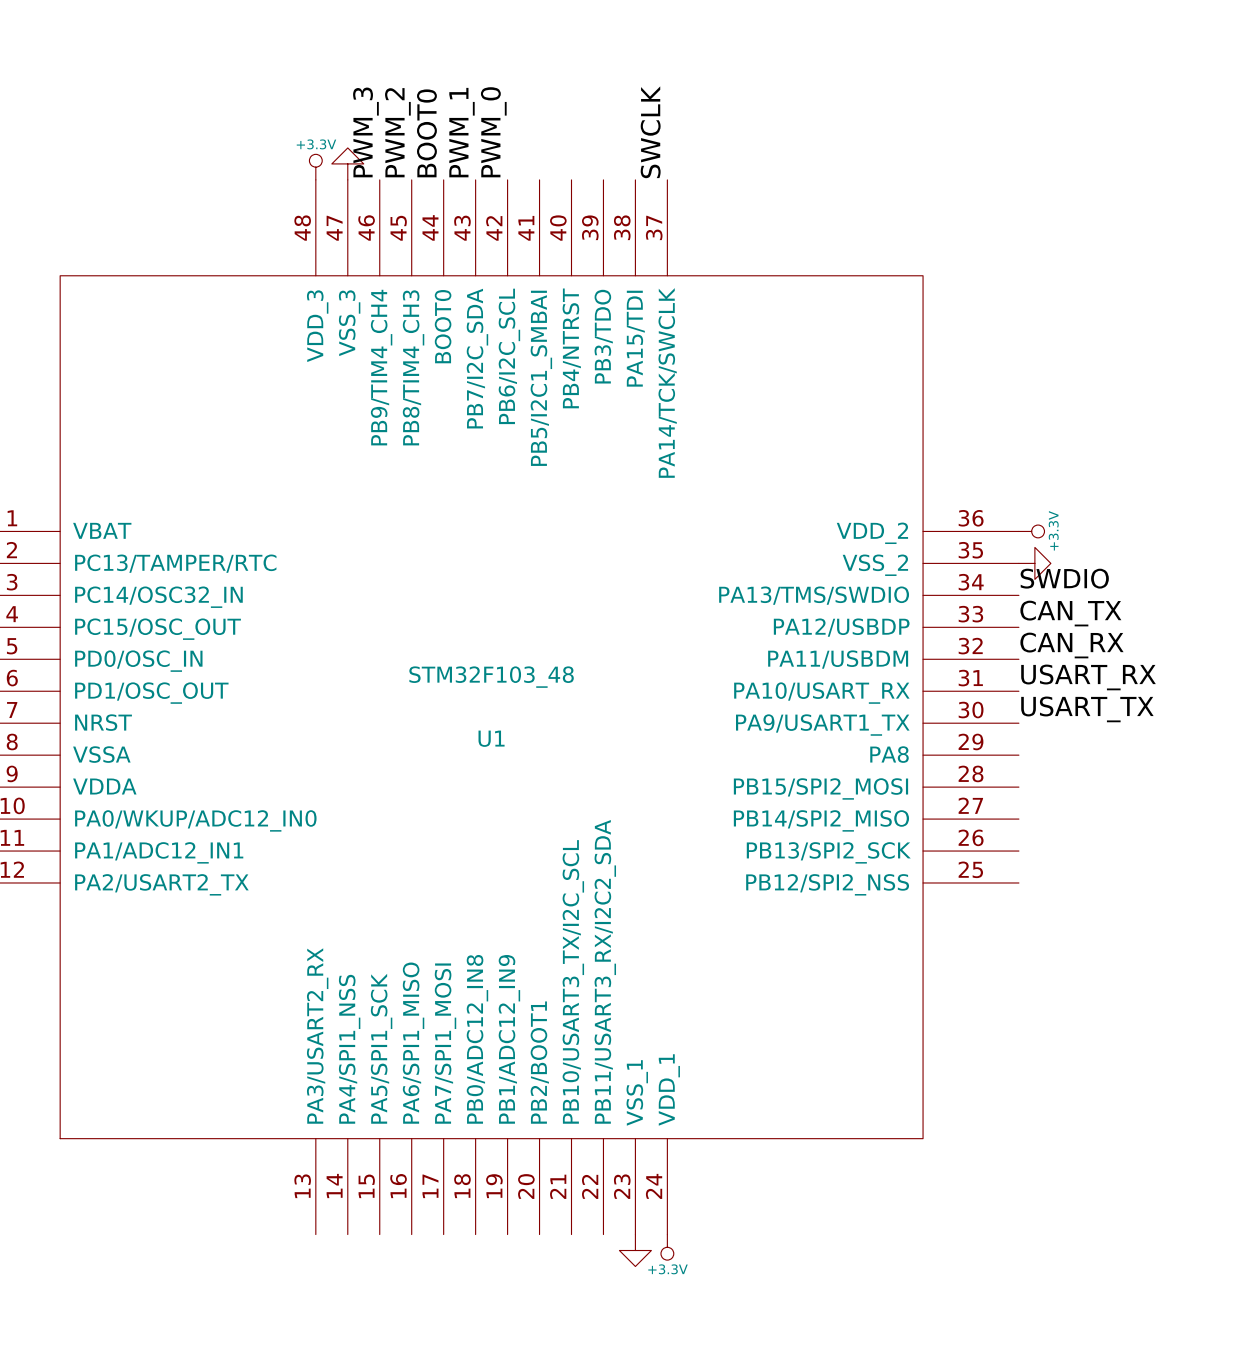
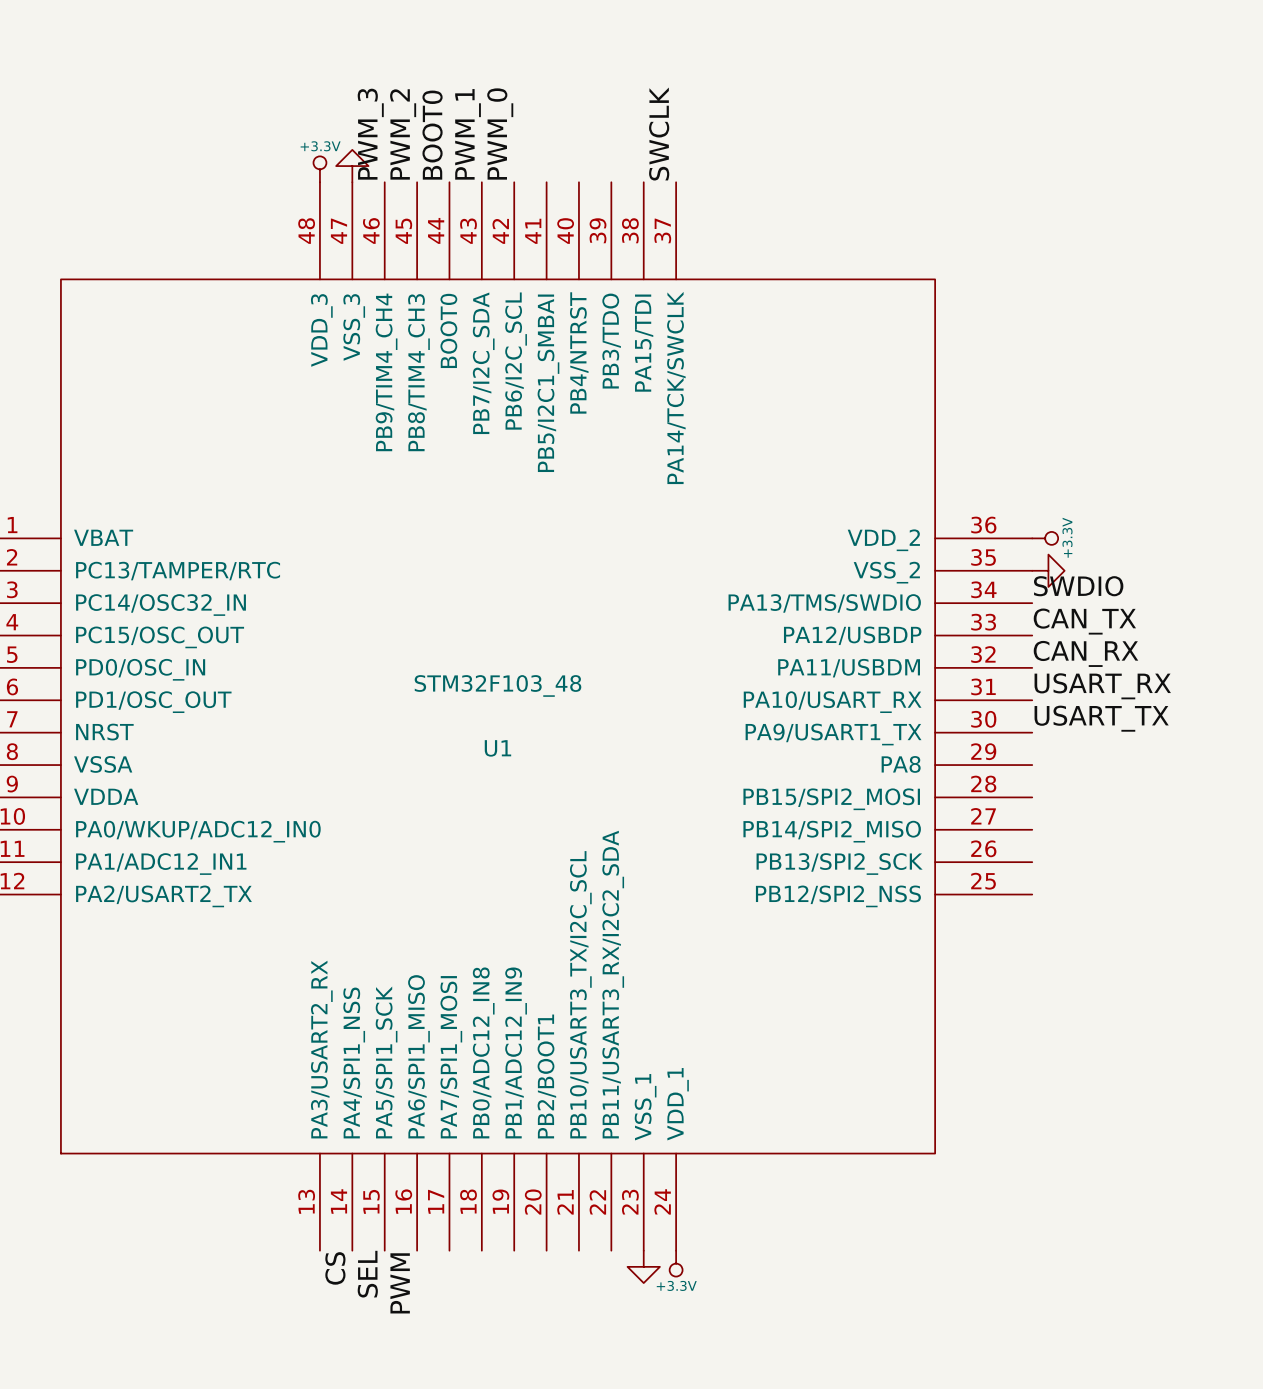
label: none -> CS (335, 1268)
label: none -> SEL (367, 1274)
label: none -> PWM (400, 1283)

